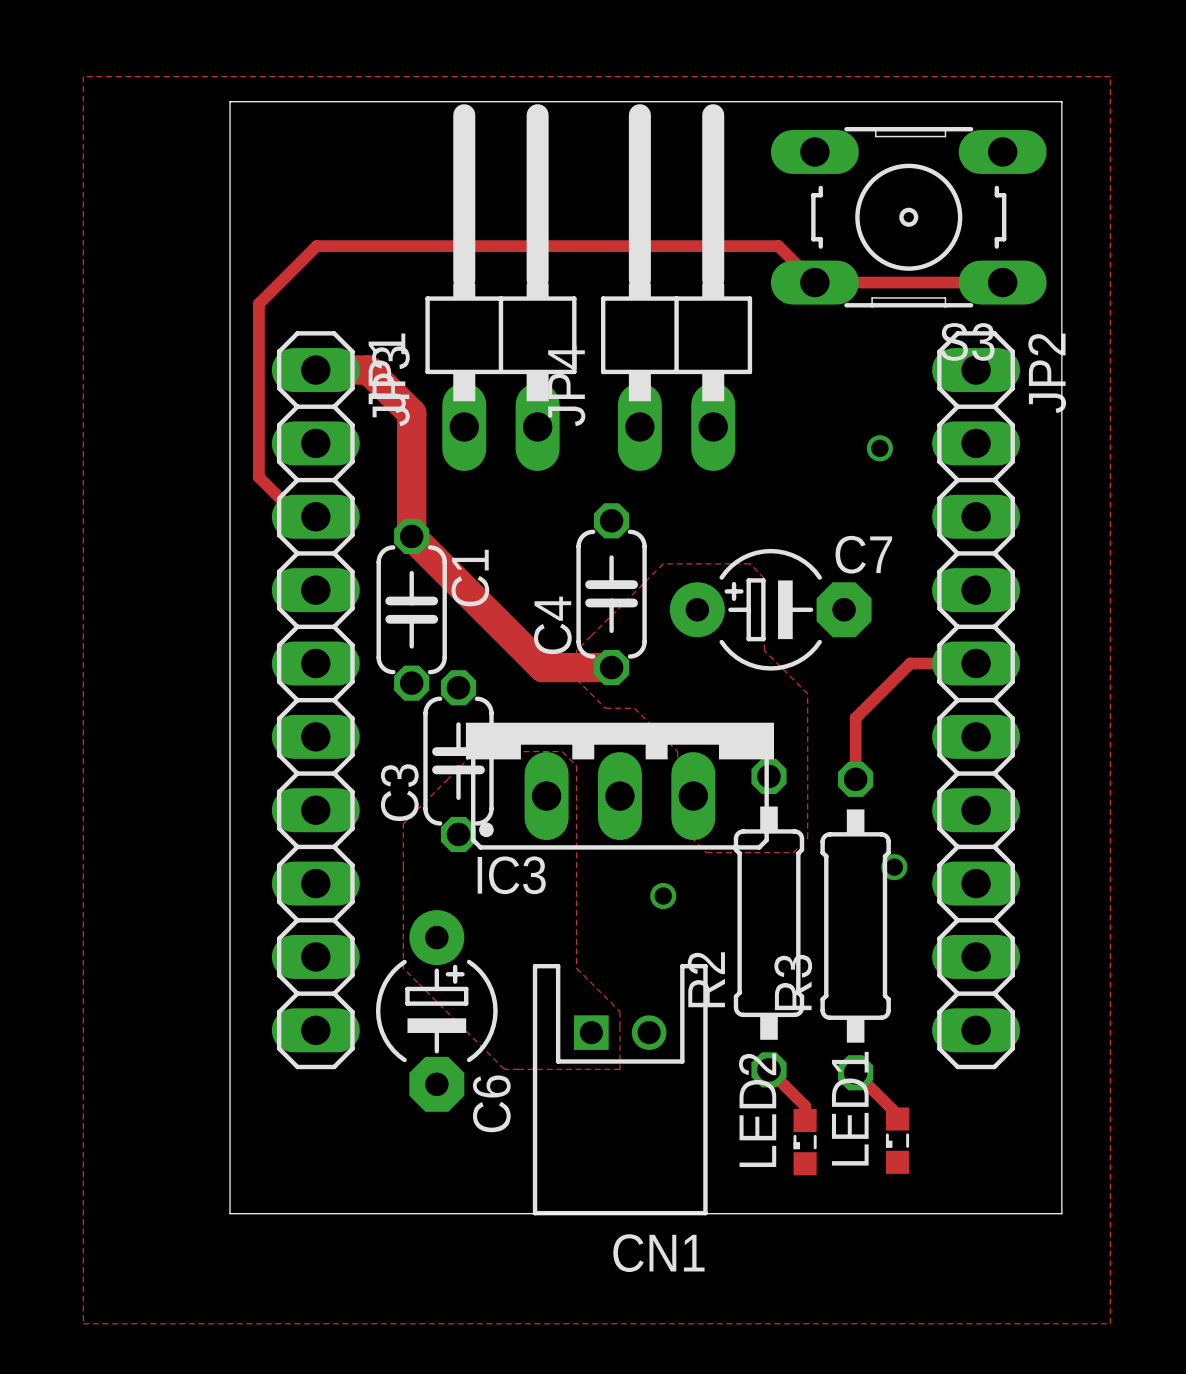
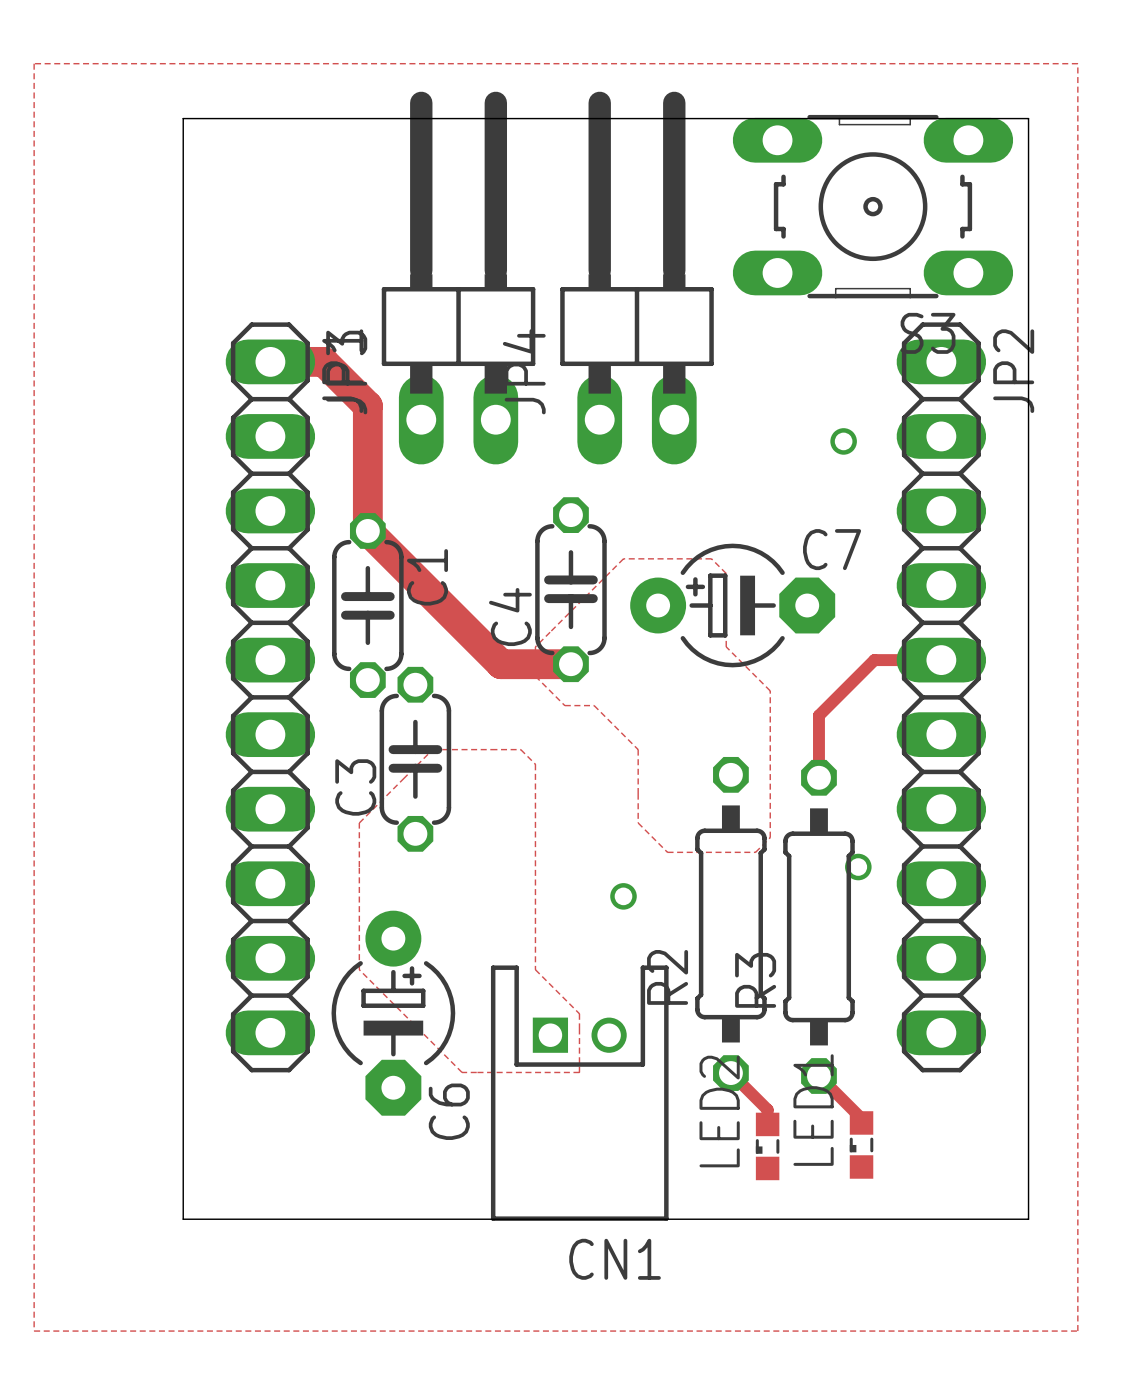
board edge: (230, 130) (230, 101) (1061, 101) (1061, 130) -> (183, 118) (1028, 118)
track: (1002, 282) (814, 282) (778, 246) (316, 246) (258, 303) (258, 477) (298, 516) (315, 516) -> none
IC3: (619, 786) -> none

